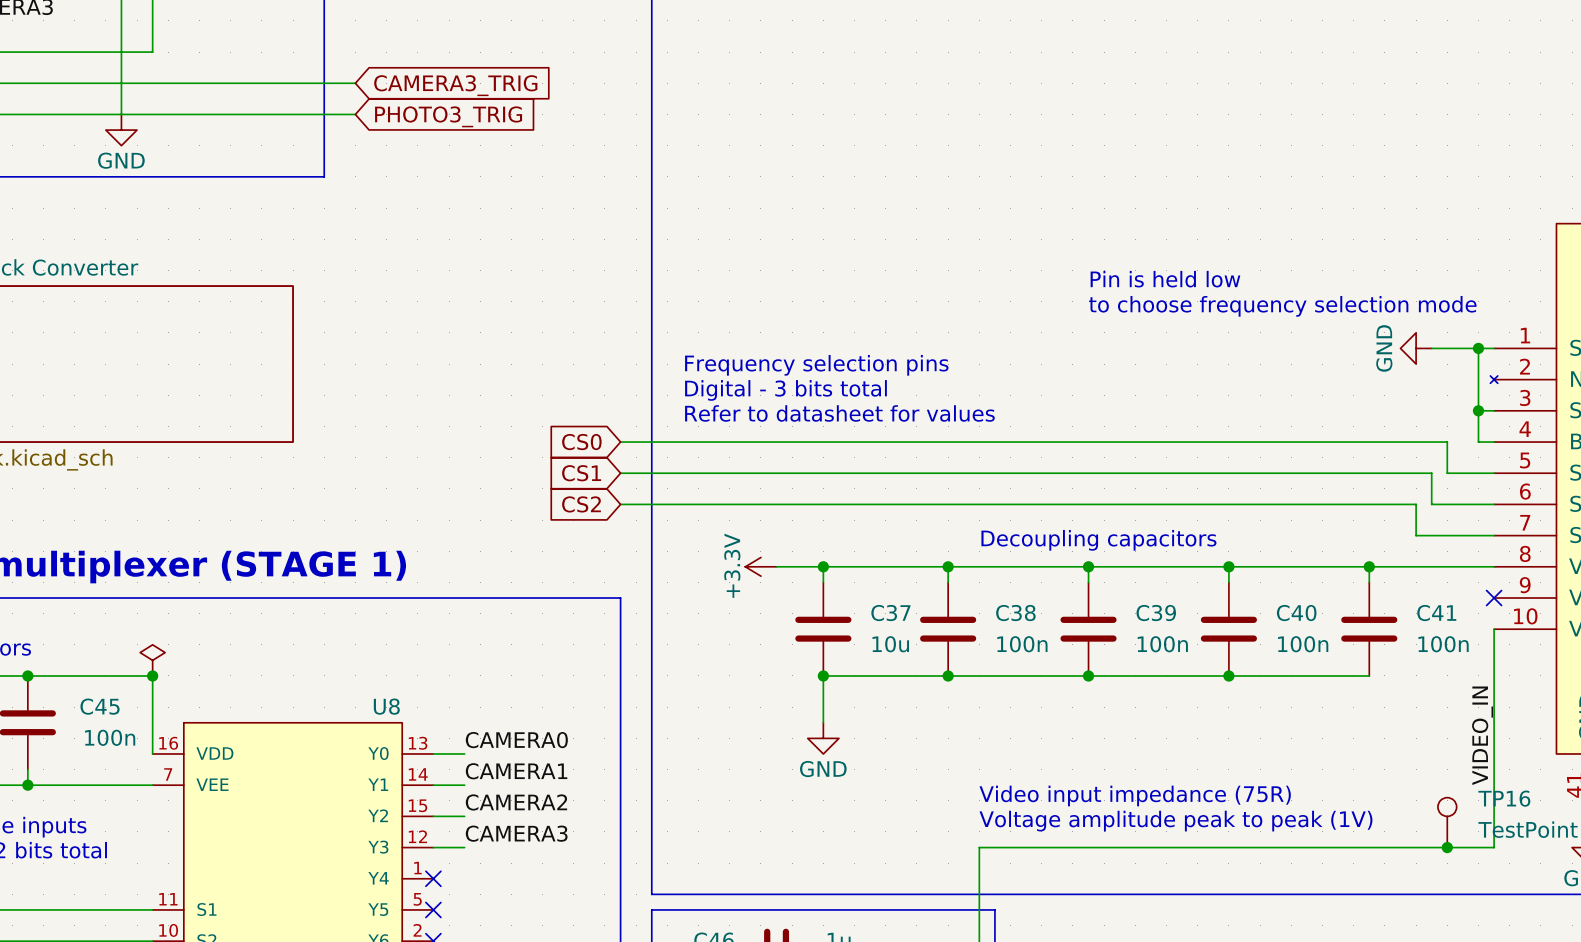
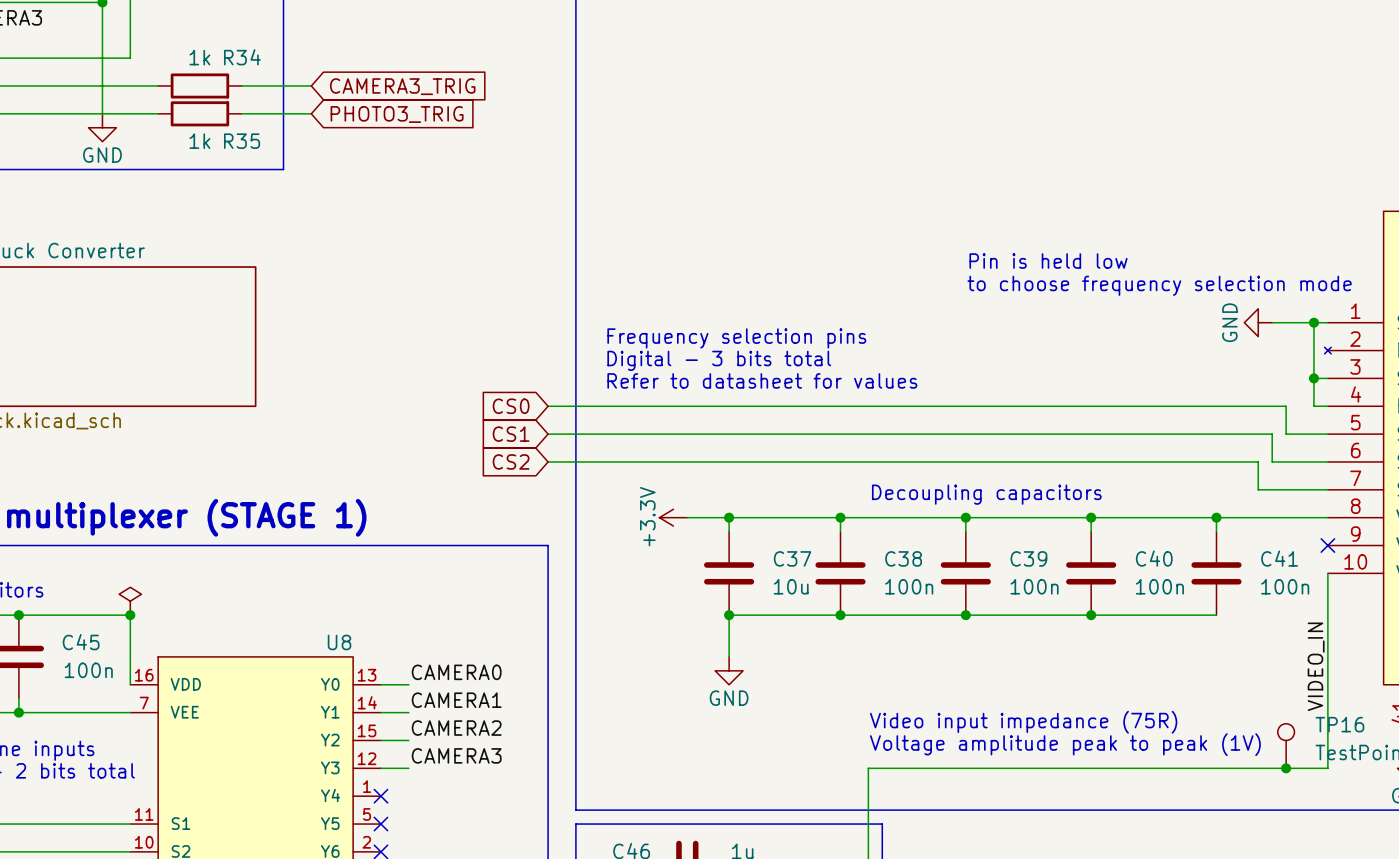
wire: (183, 83) (277, 83) -> none
R34: none -> 1k (199, 85)
wire: (183, 114) (277, 114) -> none
R35: none -> 1k (199, 113)

